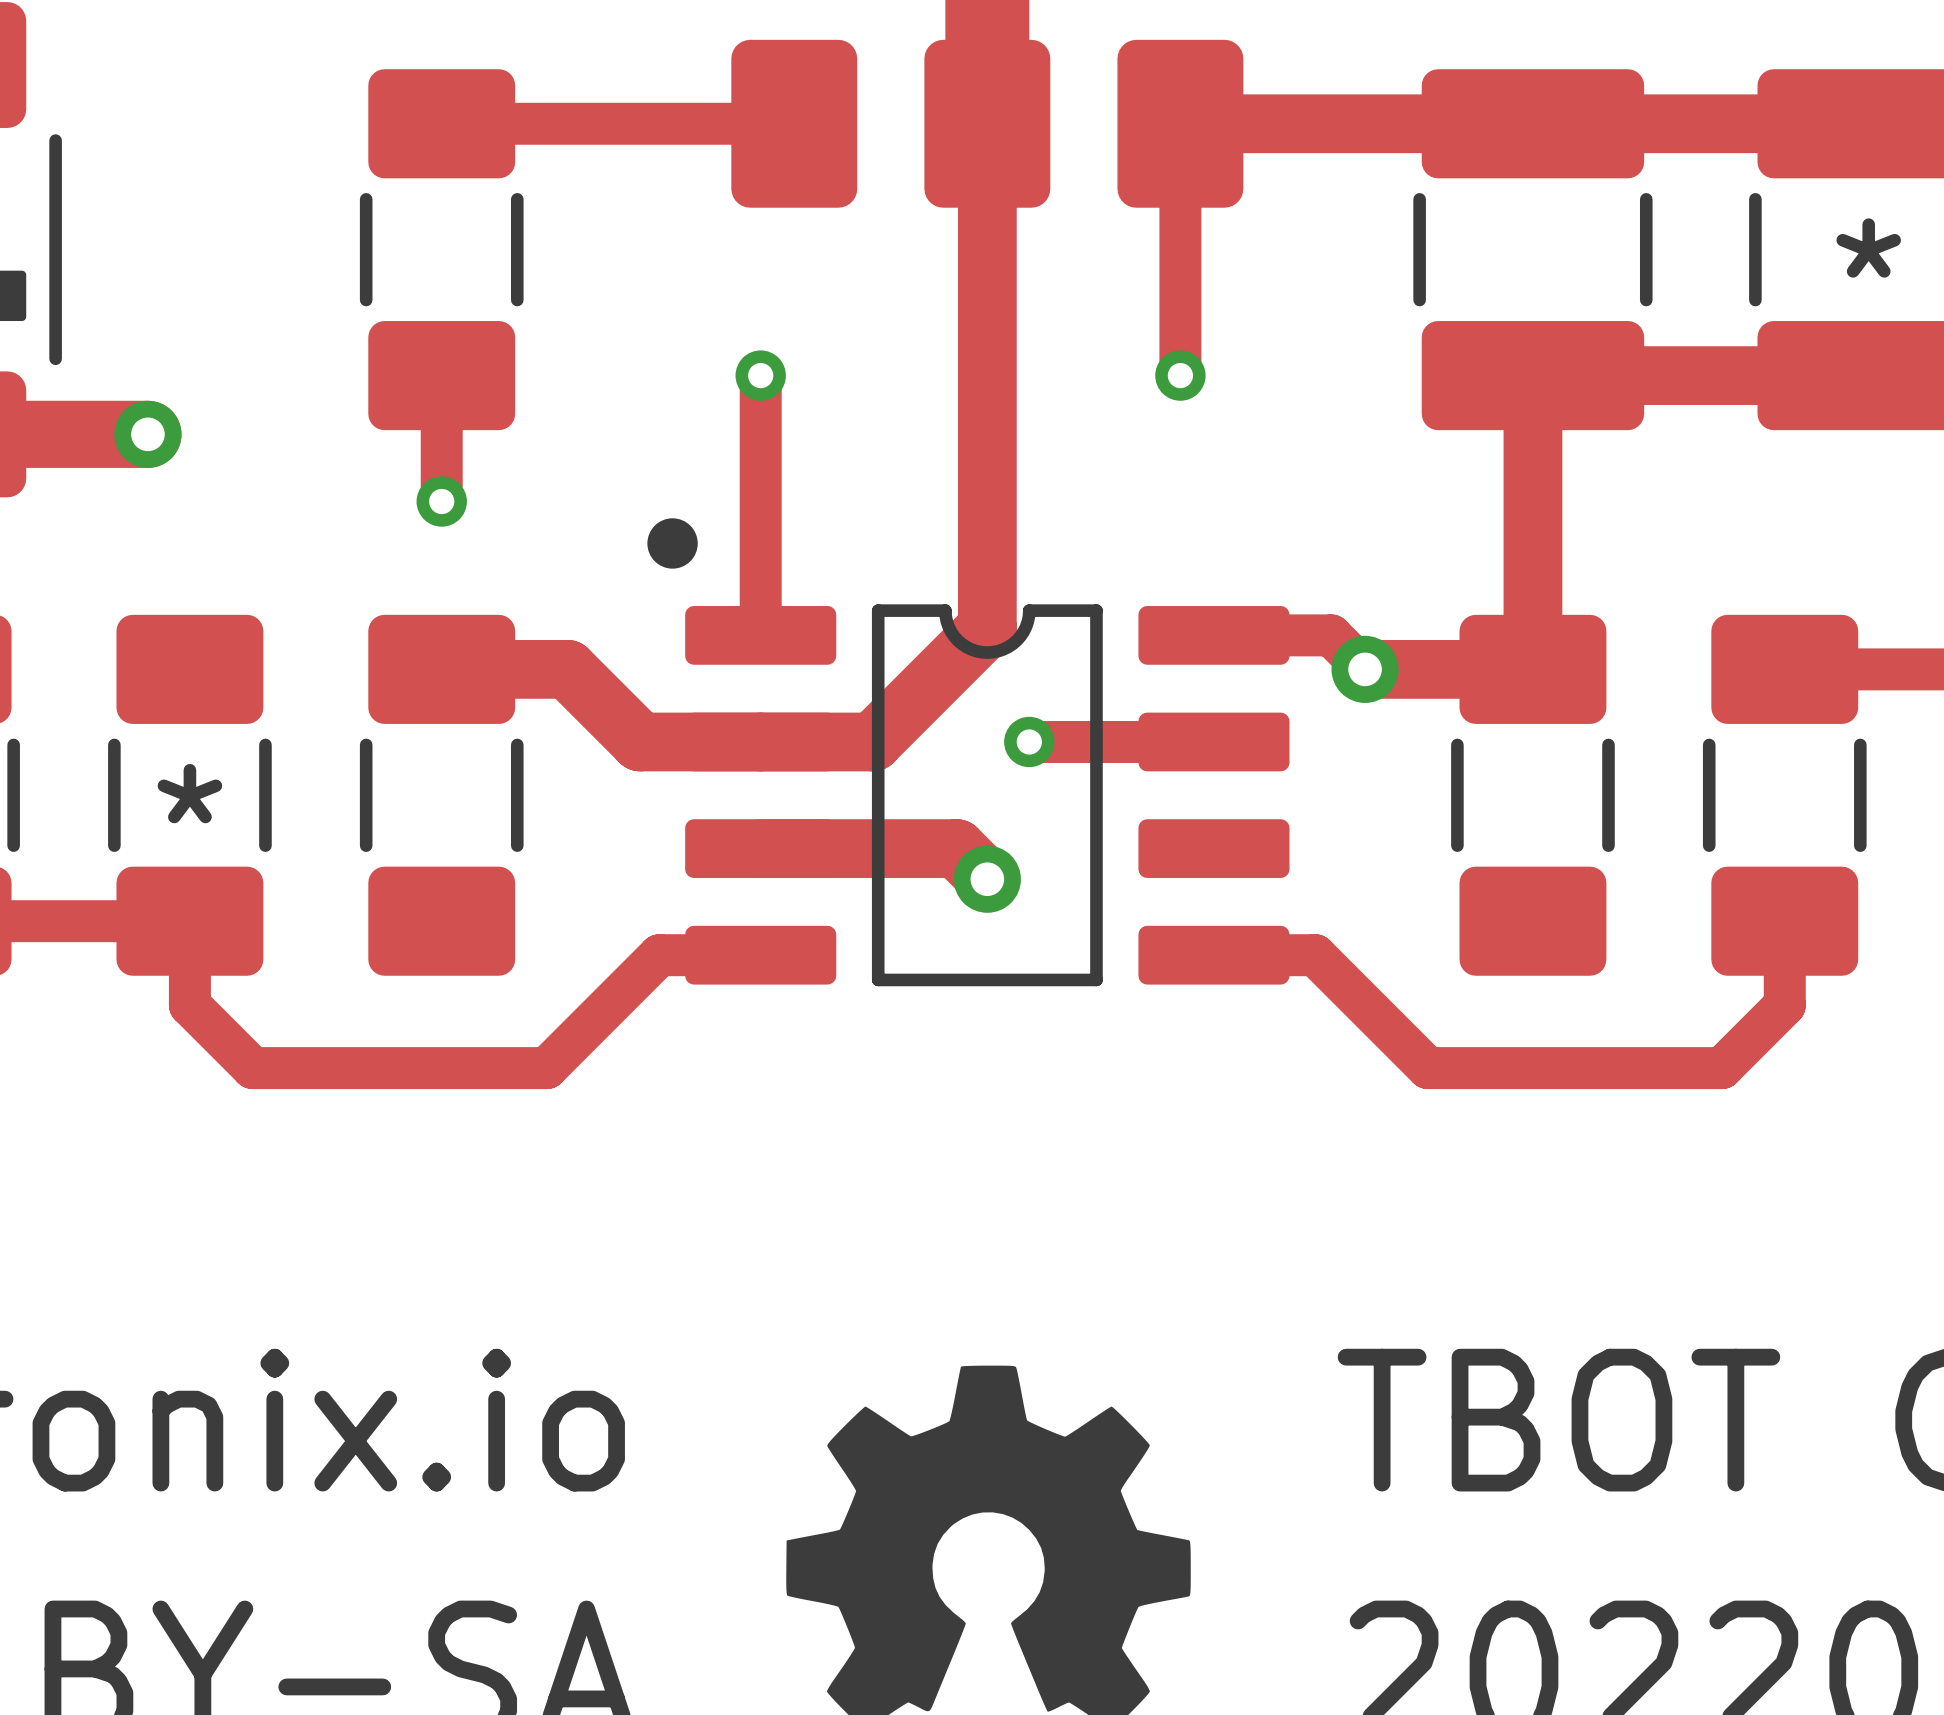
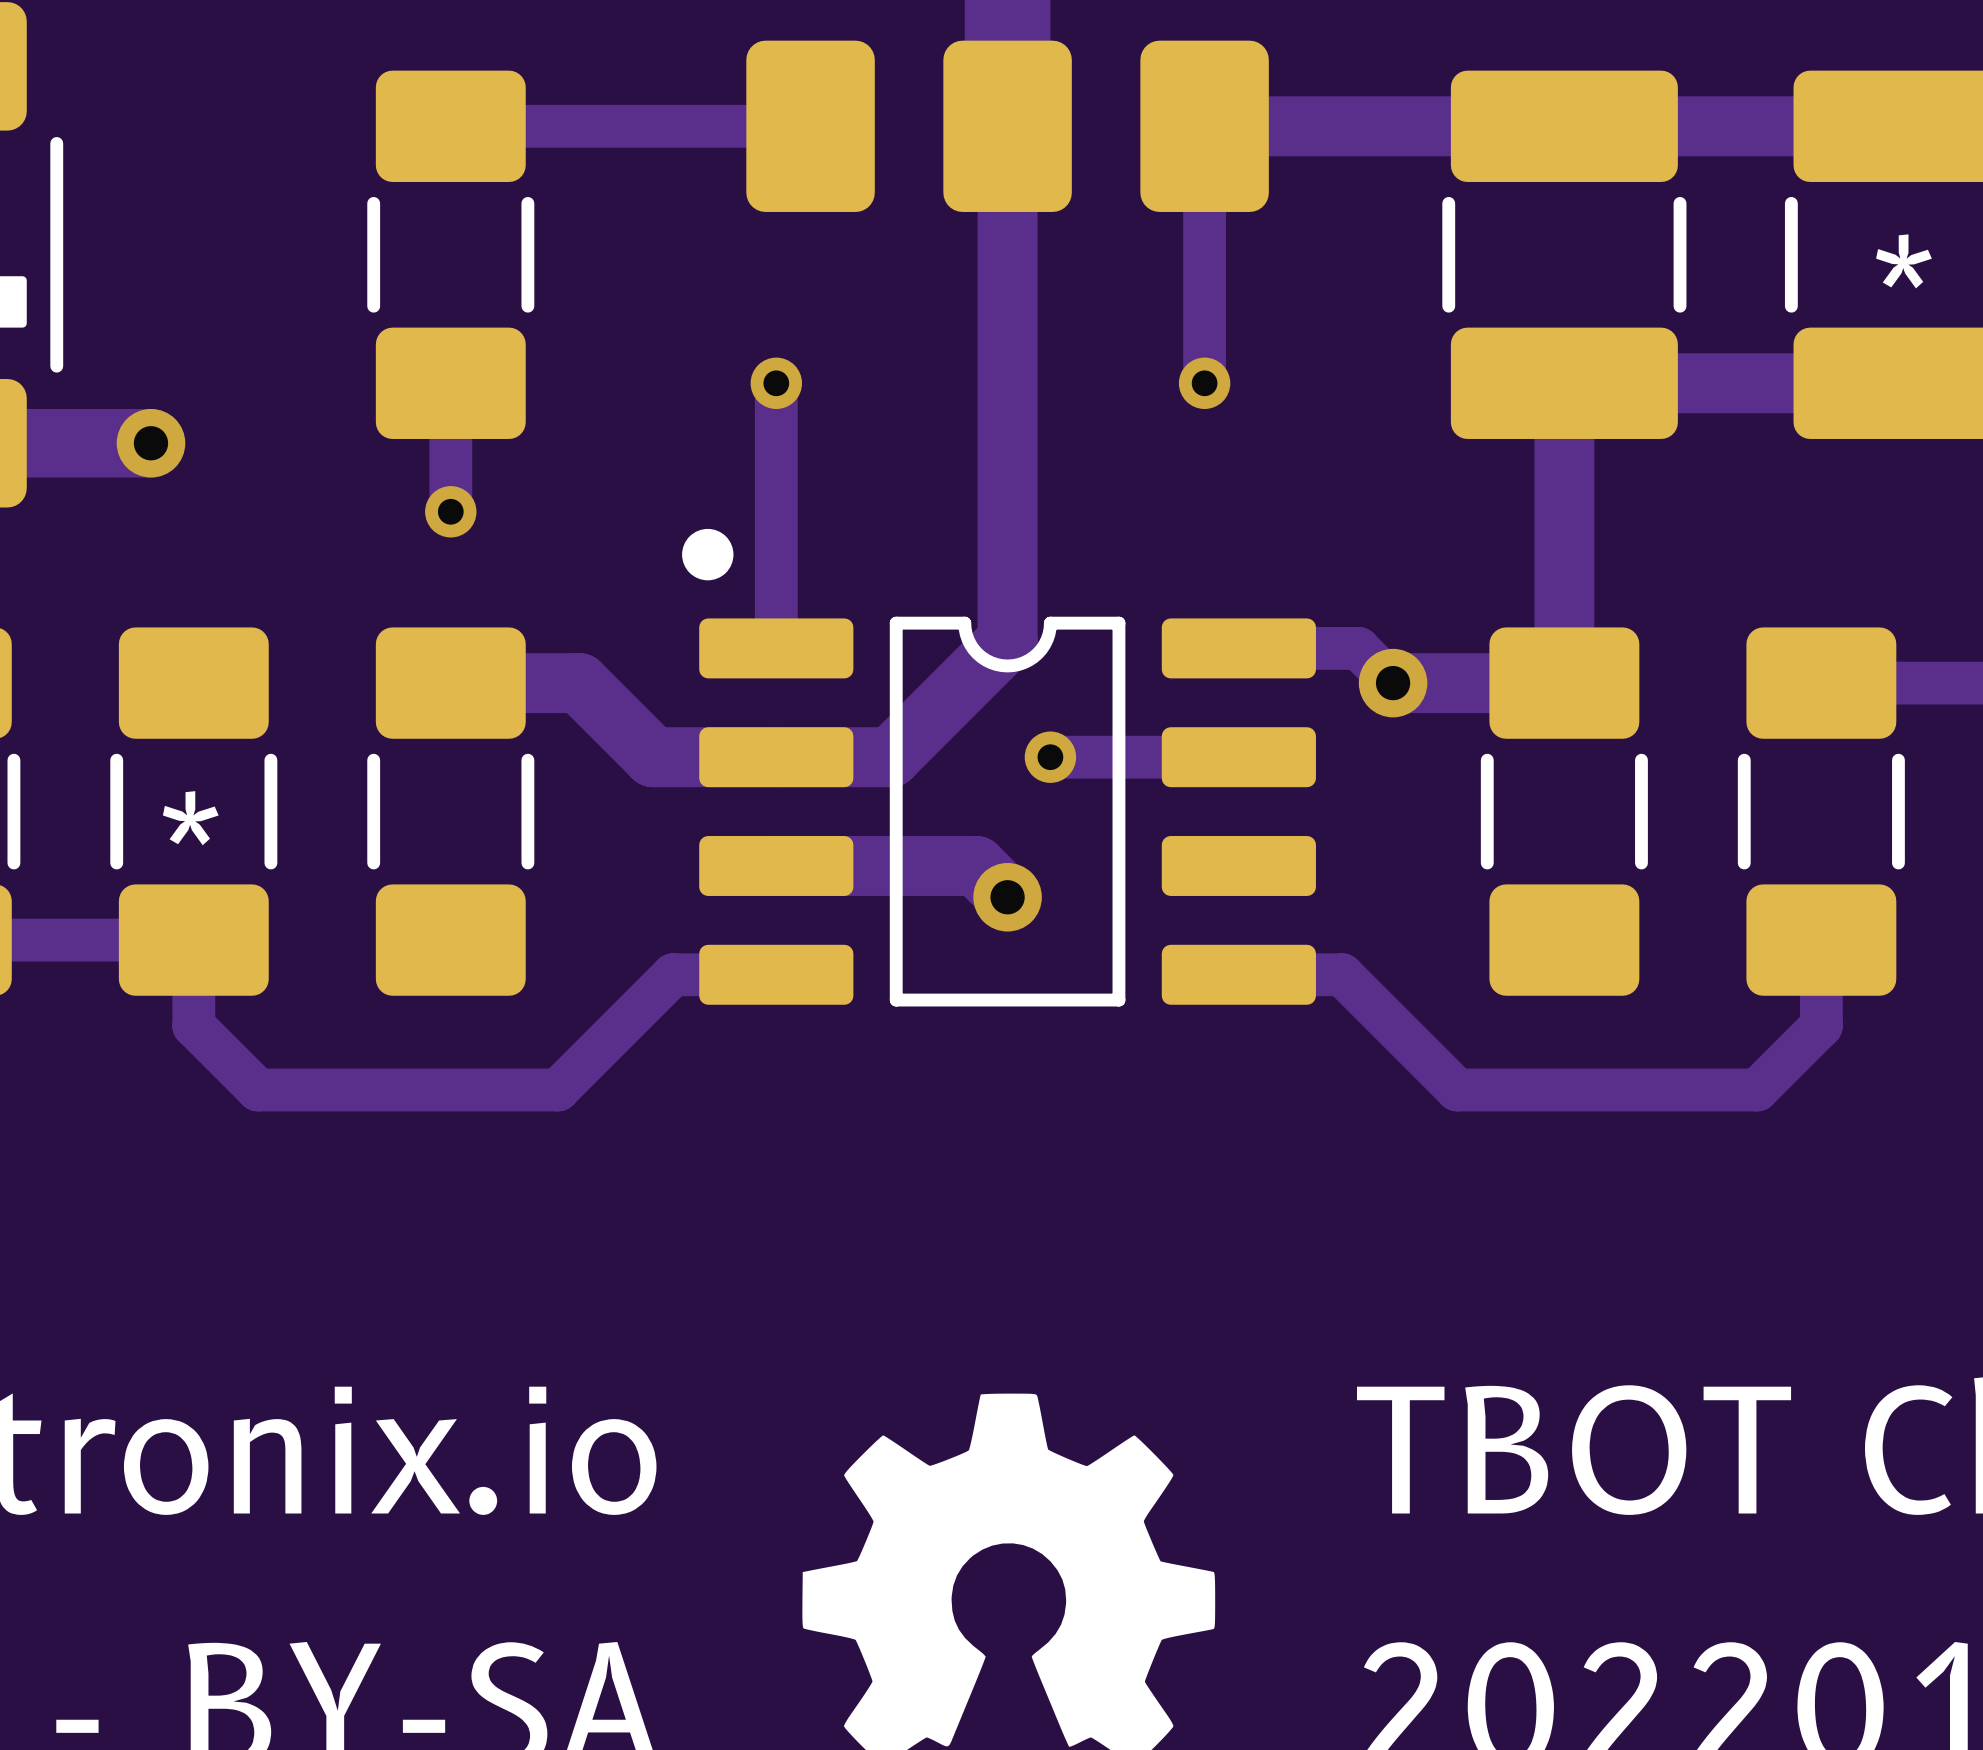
drawing position: (672, 543) -> (707, 554)

